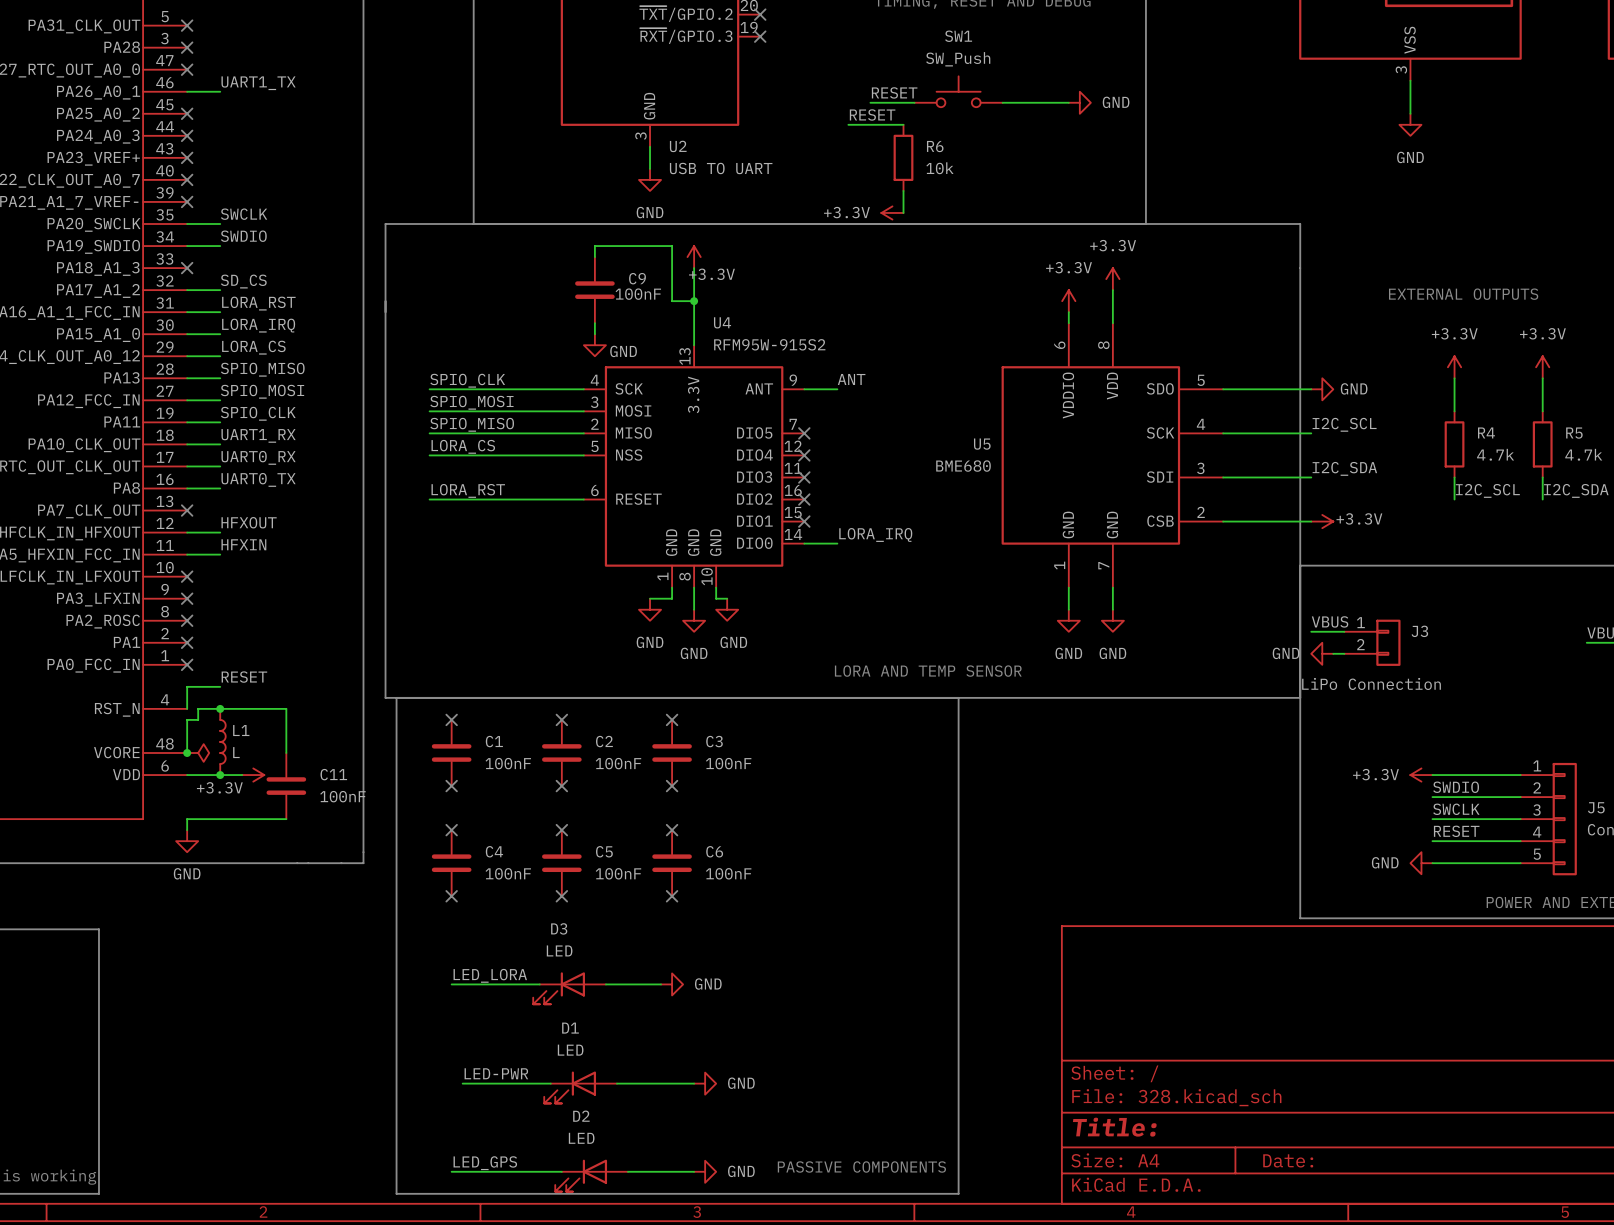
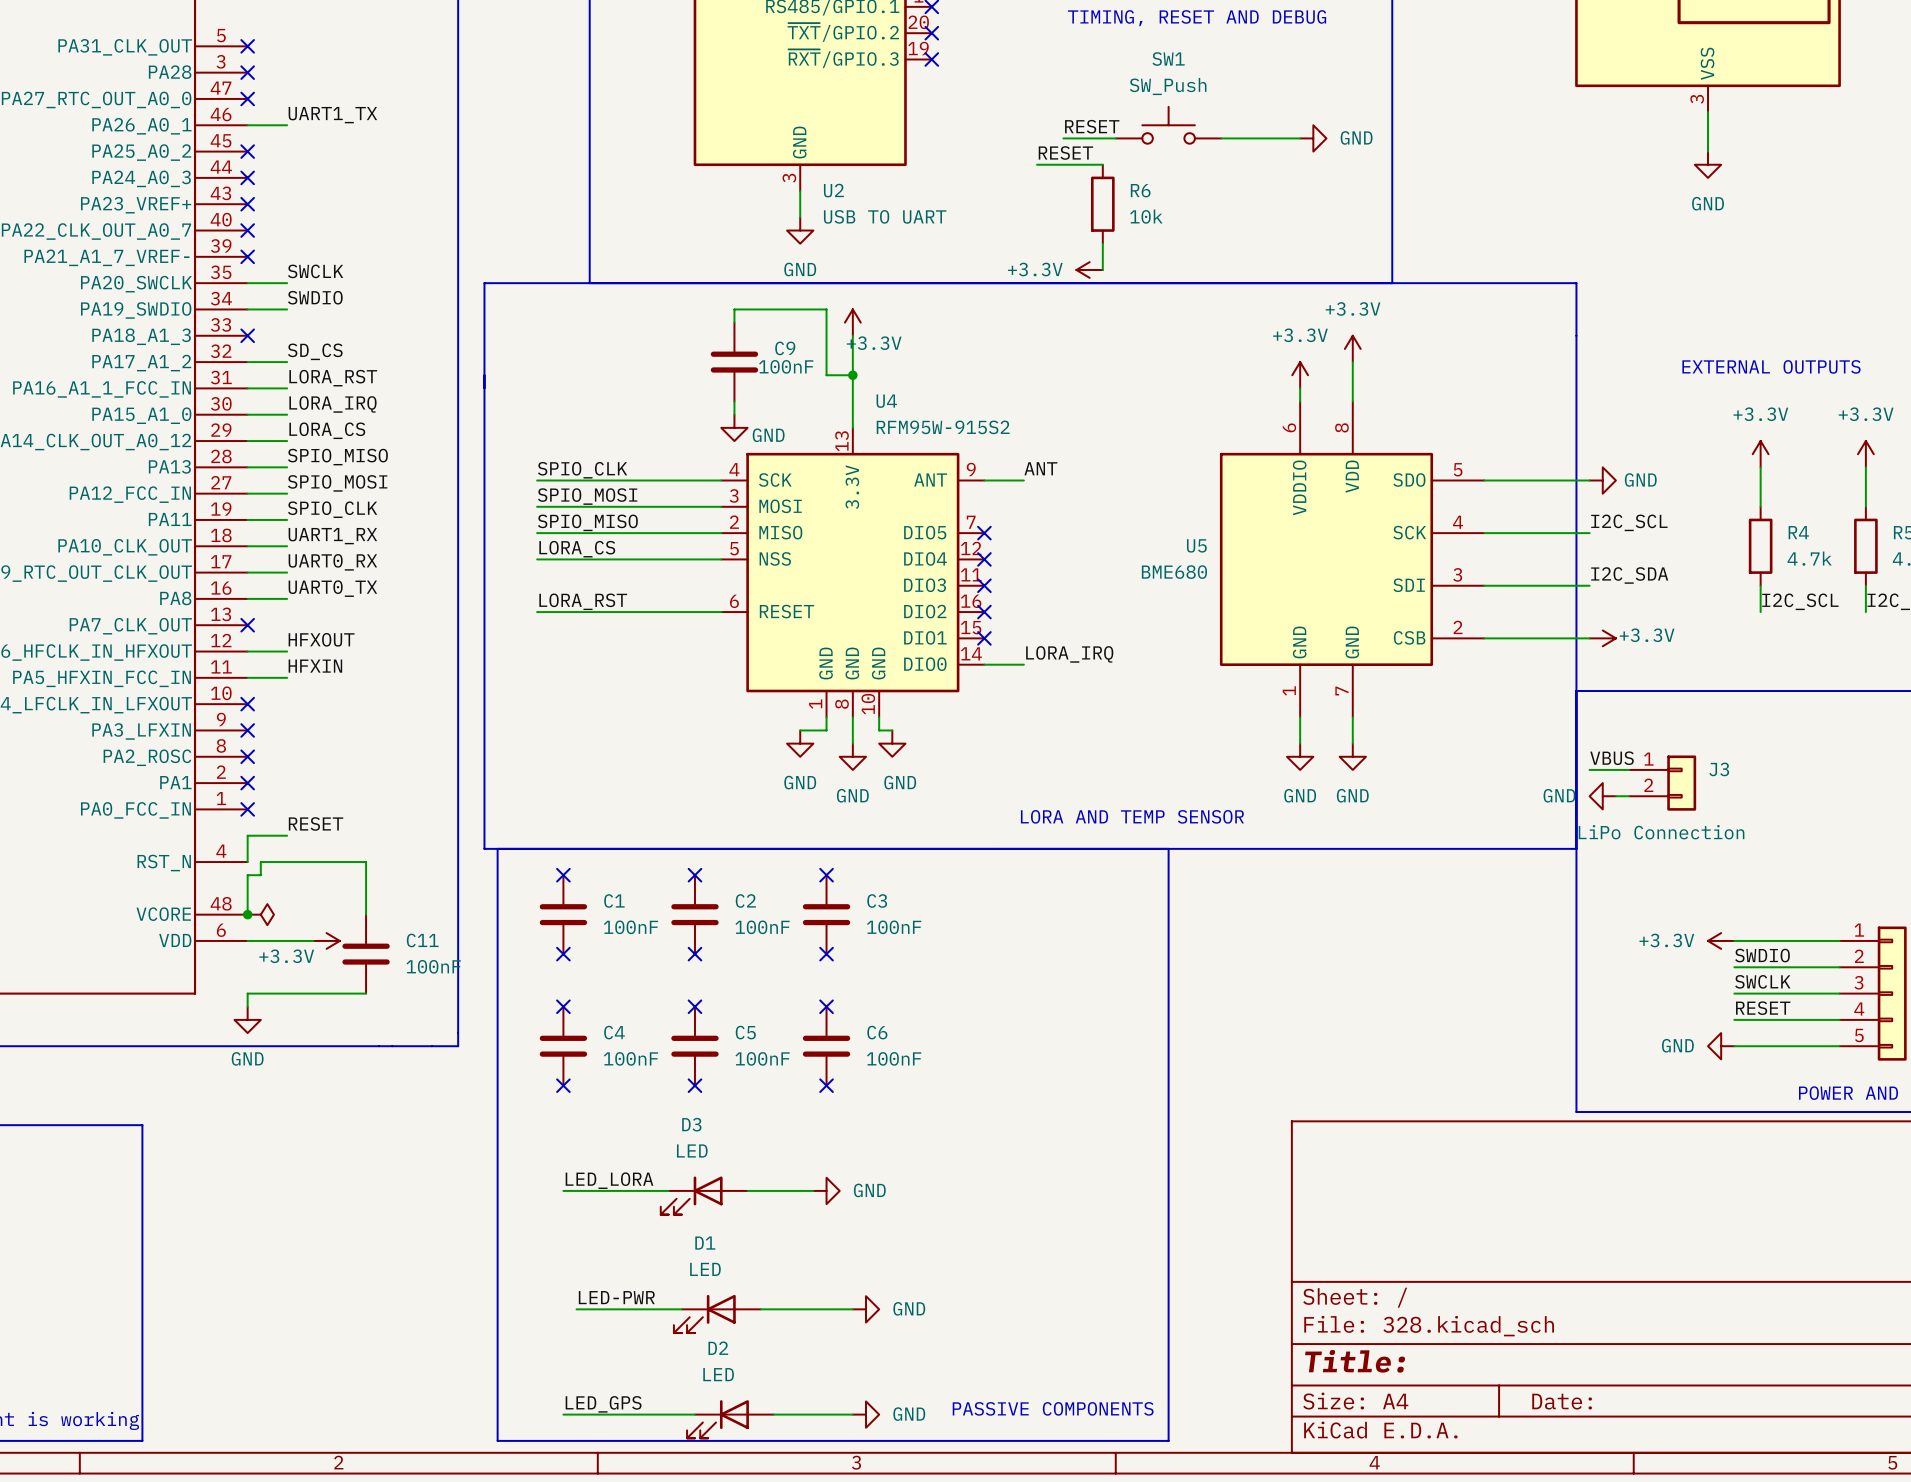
junction: (220, 708) -> none
L1: L (222, 741) -> none
junction: (220, 775) -> none

